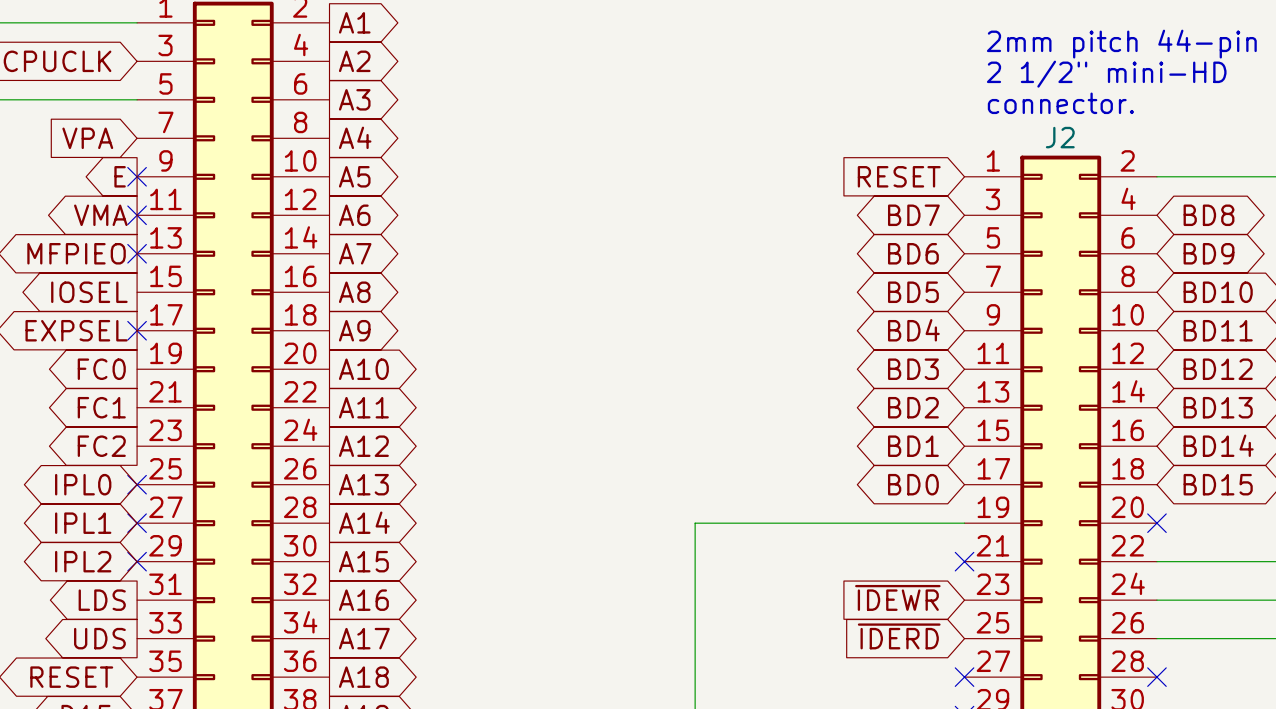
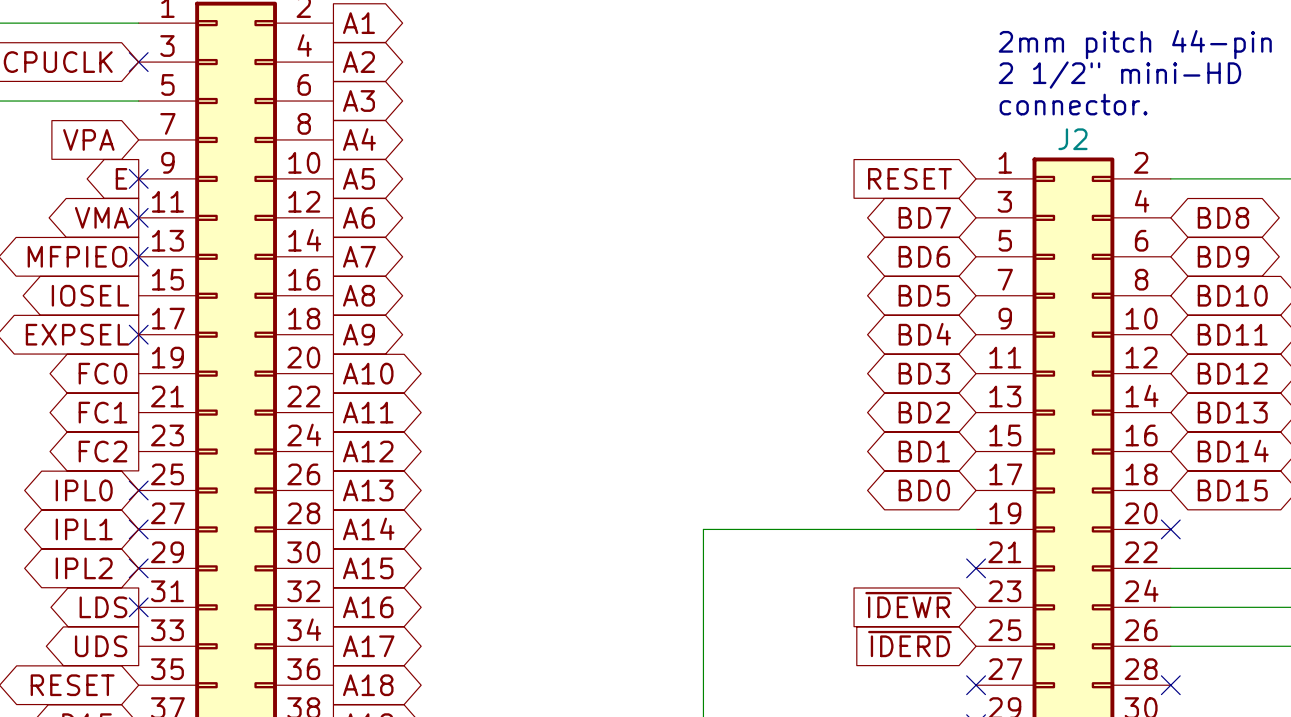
no-connect mark: none -> (138, 62)
no-connect mark: none -> (138, 607)

